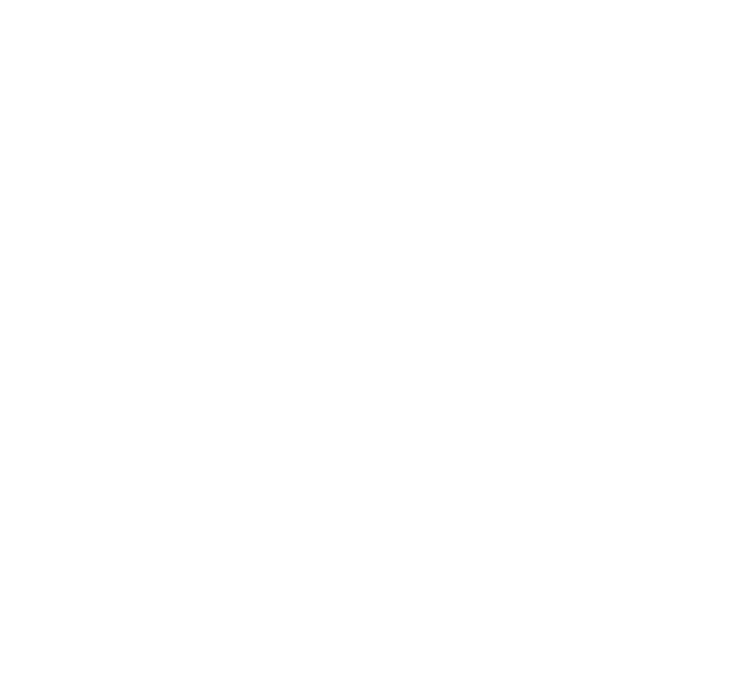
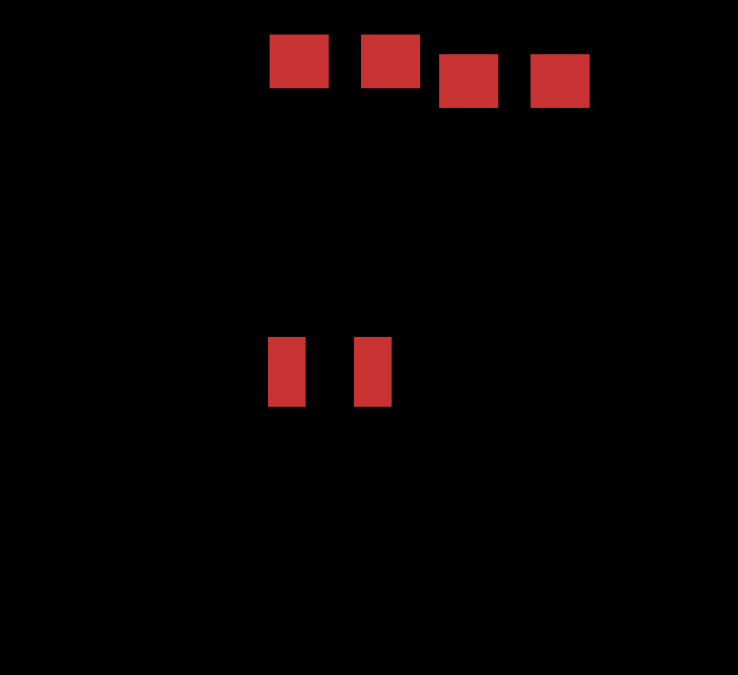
part: none -> (344, 61)
part: none -> (514, 81)
part: none -> (329, 371)

